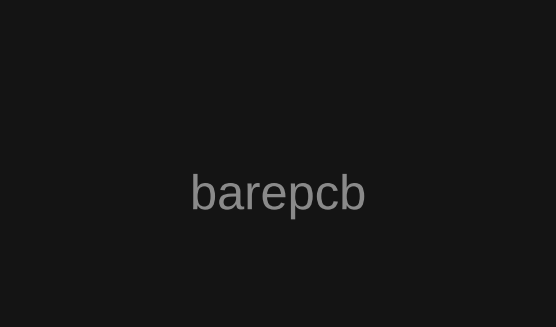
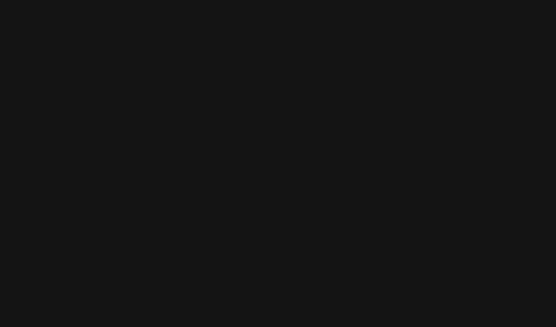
drawing: [193, 173, 365, 220] -> none

